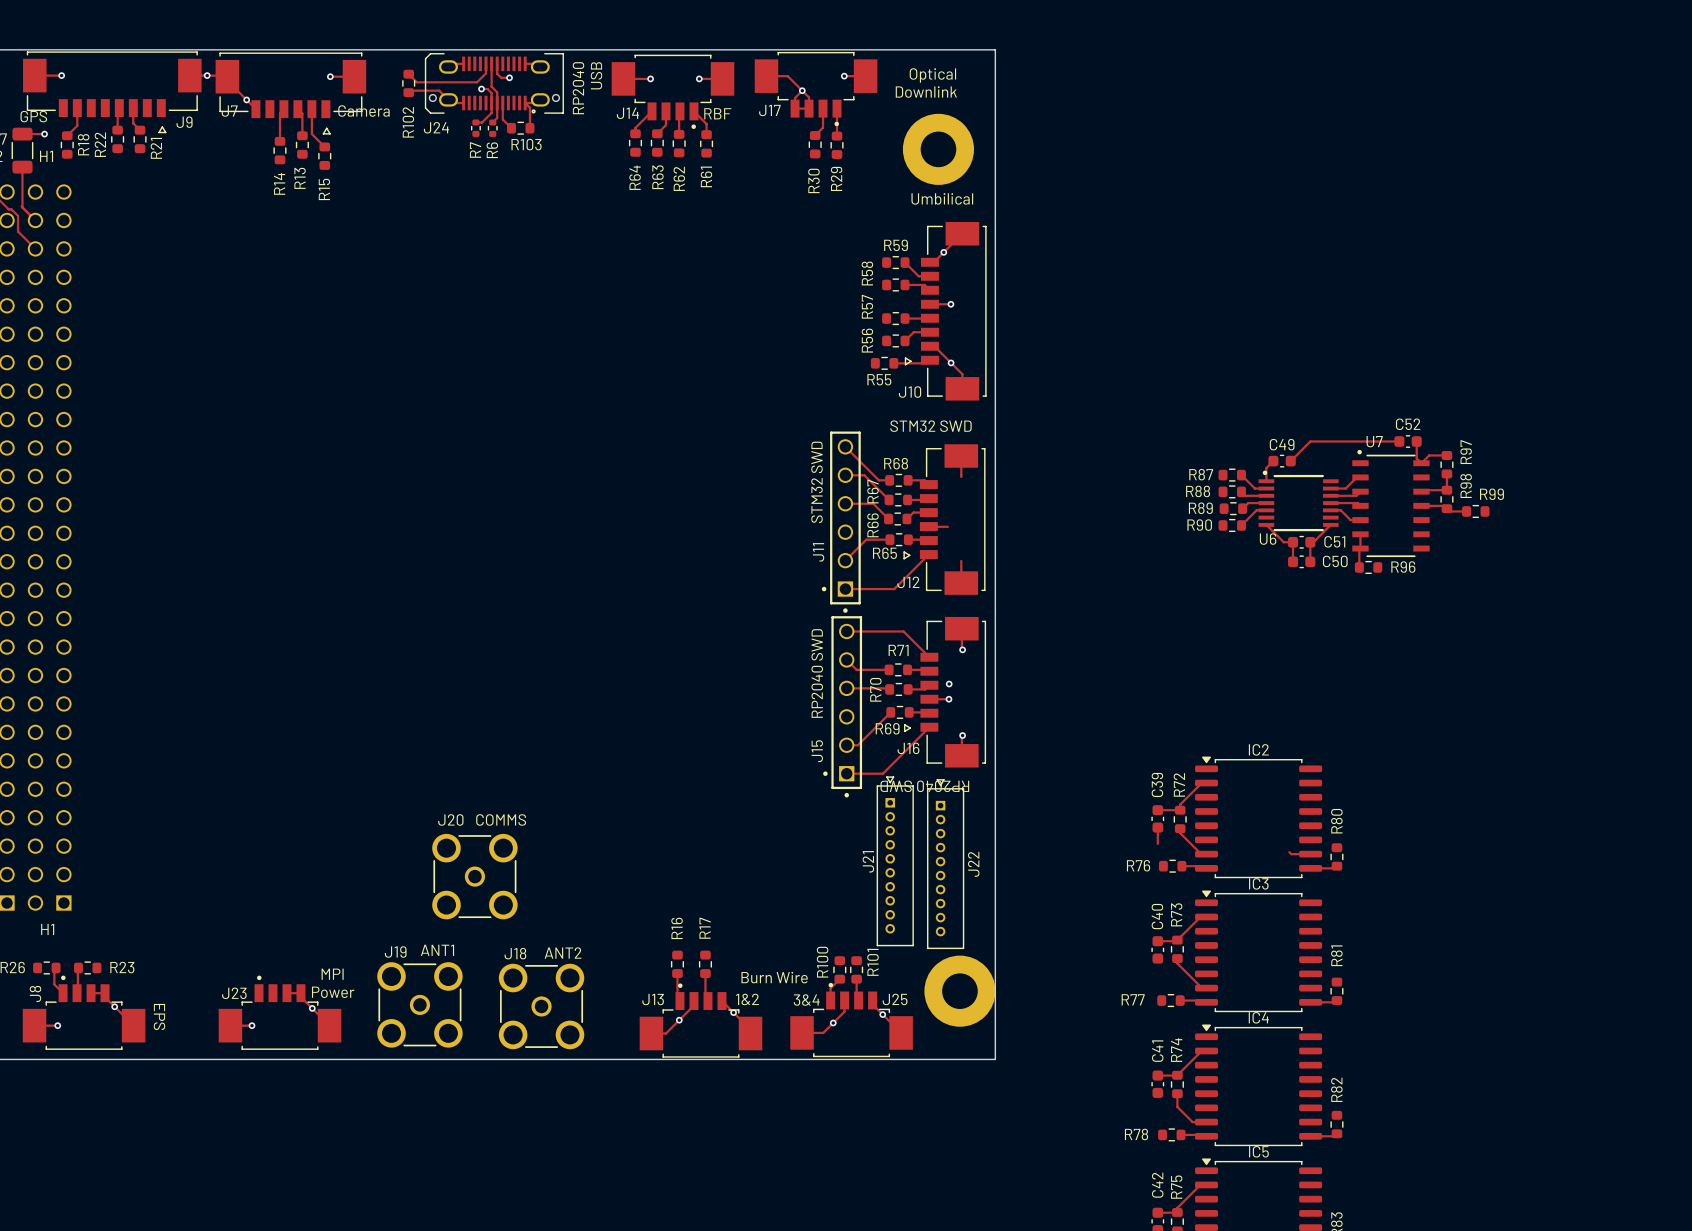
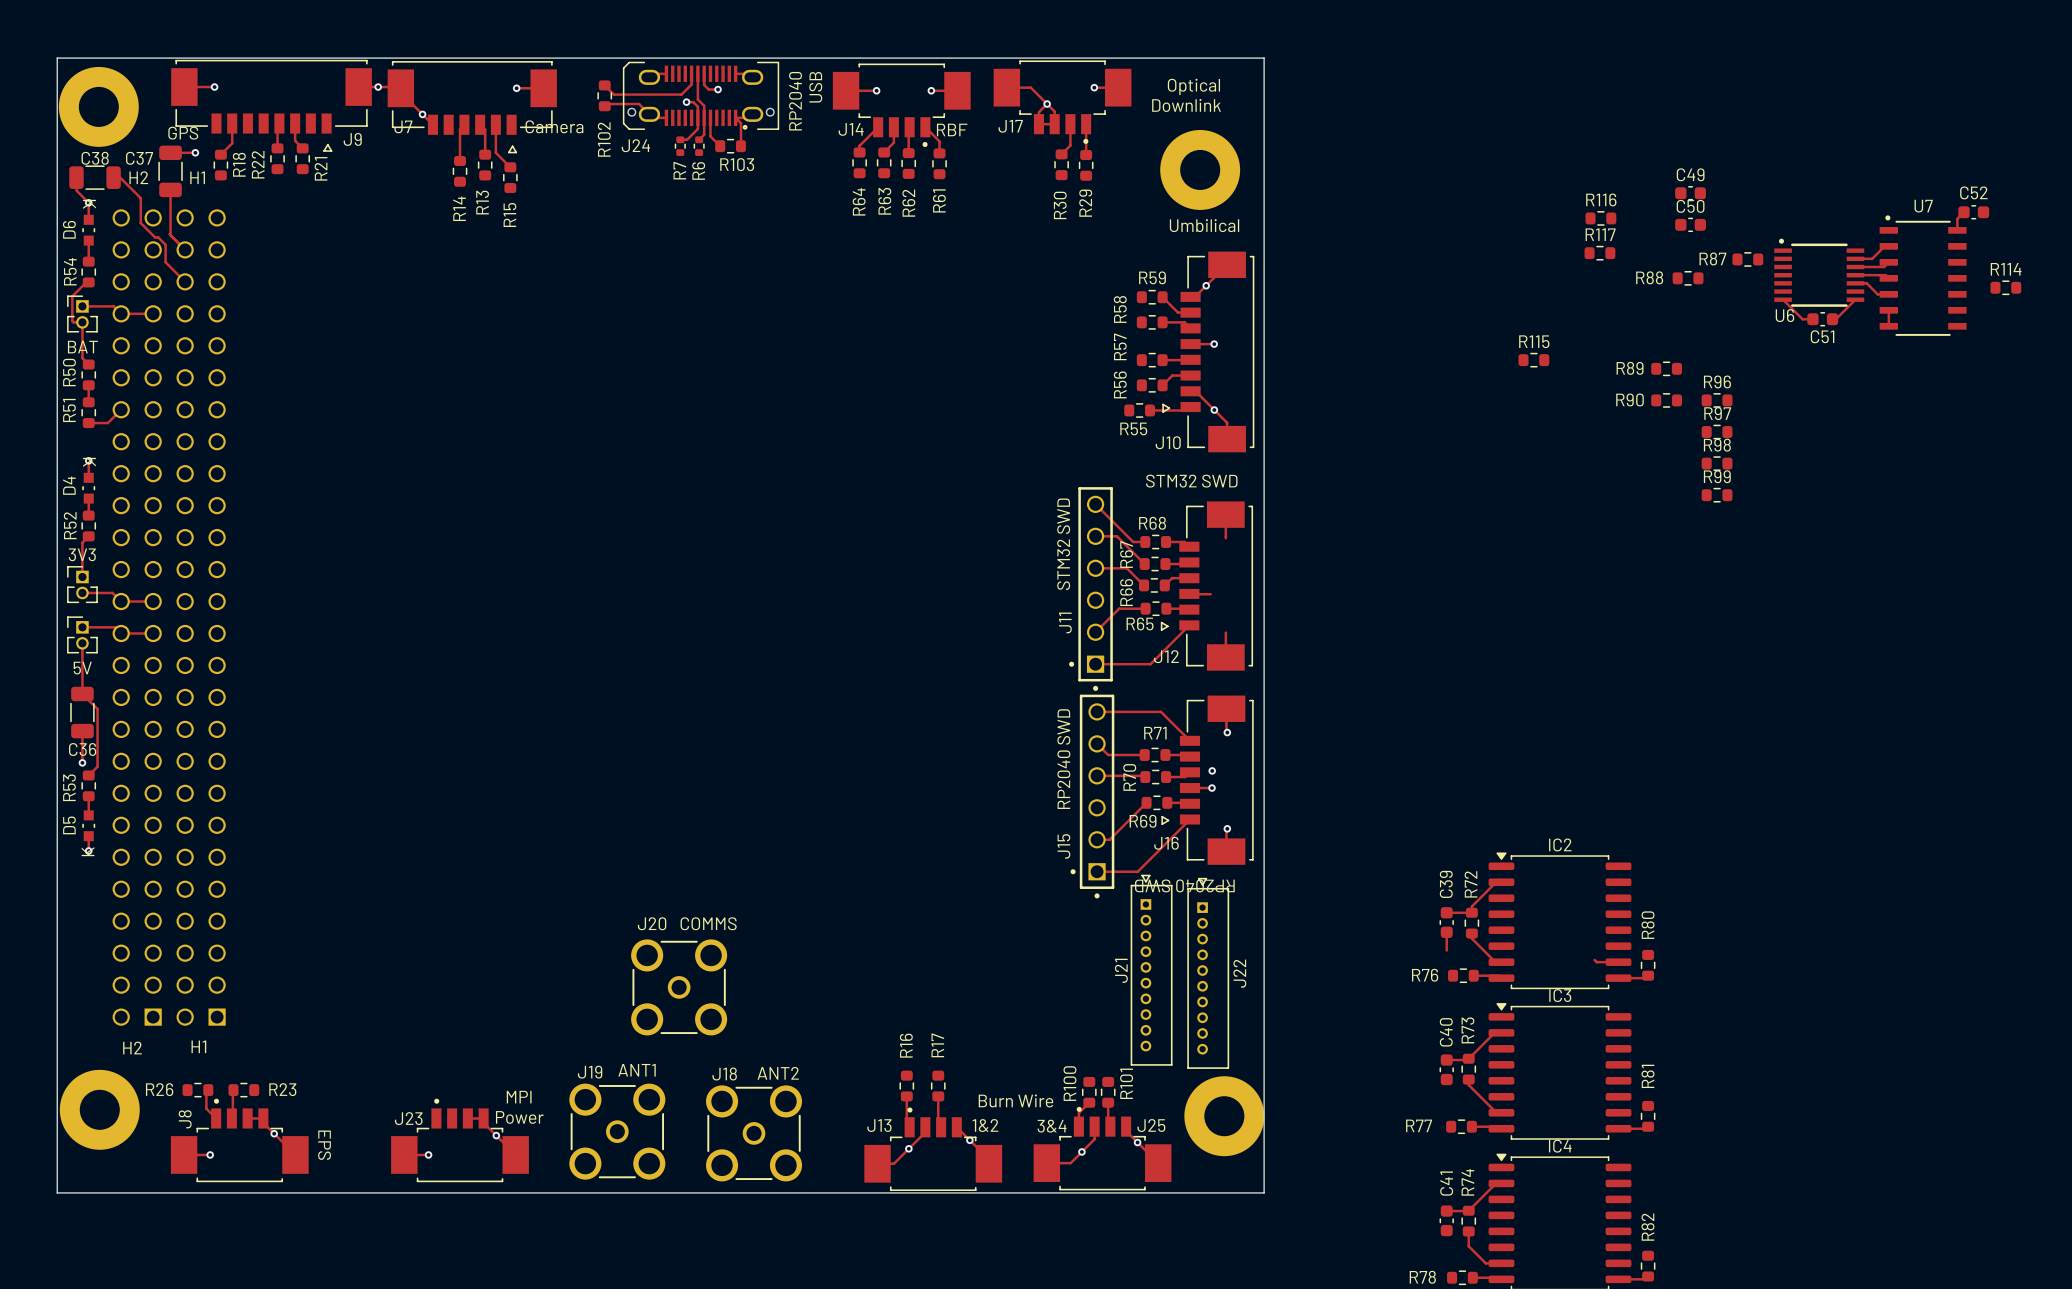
top track: none -> (1963, 212) (1957, 218) (1957, 230)
R116: none -> (1600, 218)
top track: none -> (1888, 246) (1884, 246) (1872, 258) (1855, 258)
R117: none -> (1599, 253)
top track: none -> (1888, 262) (1884, 267) (1855, 267)
top track: none -> (1855, 275) (1885, 275) (1888, 278)
top track: none -> (1855, 283) (1866, 283) (1877, 294) (1888, 294)
R114: none -> (2005, 287)
top track: none -> (1783, 299) (1802, 319) (1812, 319)
top track: none -> (1855, 299) (1835, 319) (1832, 319)
top track: none -> (1888, 310) (1888, 326)
R115: none -> (1533, 360)
U7 name position: U7 (1374, 441) -> U7 (1923, 206)
top track: (1399, 441) (1310, 441) (1290, 461) -> none
C52 position: (1408, 441) -> (1973, 212)
top track: (1416, 441) (1416, 458) (1421, 463) (1429, 455) (1446, 455) -> none
top track: (1273, 461) (1266, 468) (1266, 481) -> none
C49 position: (1282, 461) -> (1690, 193)
R97 rotation: 0° (1446, 464) -> 90° clockwise (1717, 432)
R97 position: (1446, 464) -> (1717, 432)
top track: (1446, 473) (1446, 490) (1421, 491) -> none
R87 position: (1232, 475) -> (1747, 259)
top track: (1241, 475) (1254, 488) (1266, 488) -> none
top track: (1360, 477) (1356, 477) (1345, 488) (1330, 488) -> none
R88 position: (1232, 491) -> (1688, 278)
top track: (1241, 491) (1245, 495) (1266, 495) -> none
top track: (1360, 491) (1356, 495) (1330, 495) -> none
R99 name position: R99 (1491, 494) -> R99 (1717, 476)
R98 rotation: 0° (1446, 499) -> 90° clockwise (1717, 463)
R98 position: (1446, 499) -> (1717, 463)
U6 position: (1298, 500) -> (1819, 272)
top track: (1266, 503) (1248, 503) (1242, 508) -> none
top track: (1330, 503) (1357, 503) (1360, 505) -> none
U7 position: (1390, 503) -> (1923, 275)
top track: (1421, 505) (1444, 505) (1449, 511) (1466, 511) -> none
R89 position: (1233, 508) -> (1666, 368)
top track: (1266, 510) (1256, 510) (1241, 525) -> none
top track: (1330, 510) (1340, 510) (1350, 520) (1360, 520) -> none
R99 position: (1475, 511) -> (1717, 495)
top track: (1266, 524) (1283, 542) (1292, 542) (1292, 561) -> none
top track: (1330, 524) (1313, 542) (1310, 542) (1310, 561) -> none
R90 position: (1232, 525) -> (1666, 400)
top track: (1360, 534) (1359, 567) -> none
C51 name position: C51 (1334, 541) -> C51 (1822, 336)
C51 position: (1301, 542) -> (1822, 319)
C50 position: (1301, 561) -> (1690, 224)
C50 name position: C50 (1335, 561) -> C50 (1690, 206)
R96 position: (1368, 567) -> (1717, 400)
R96 name position: R96 (1403, 567) -> R96 (1717, 381)

